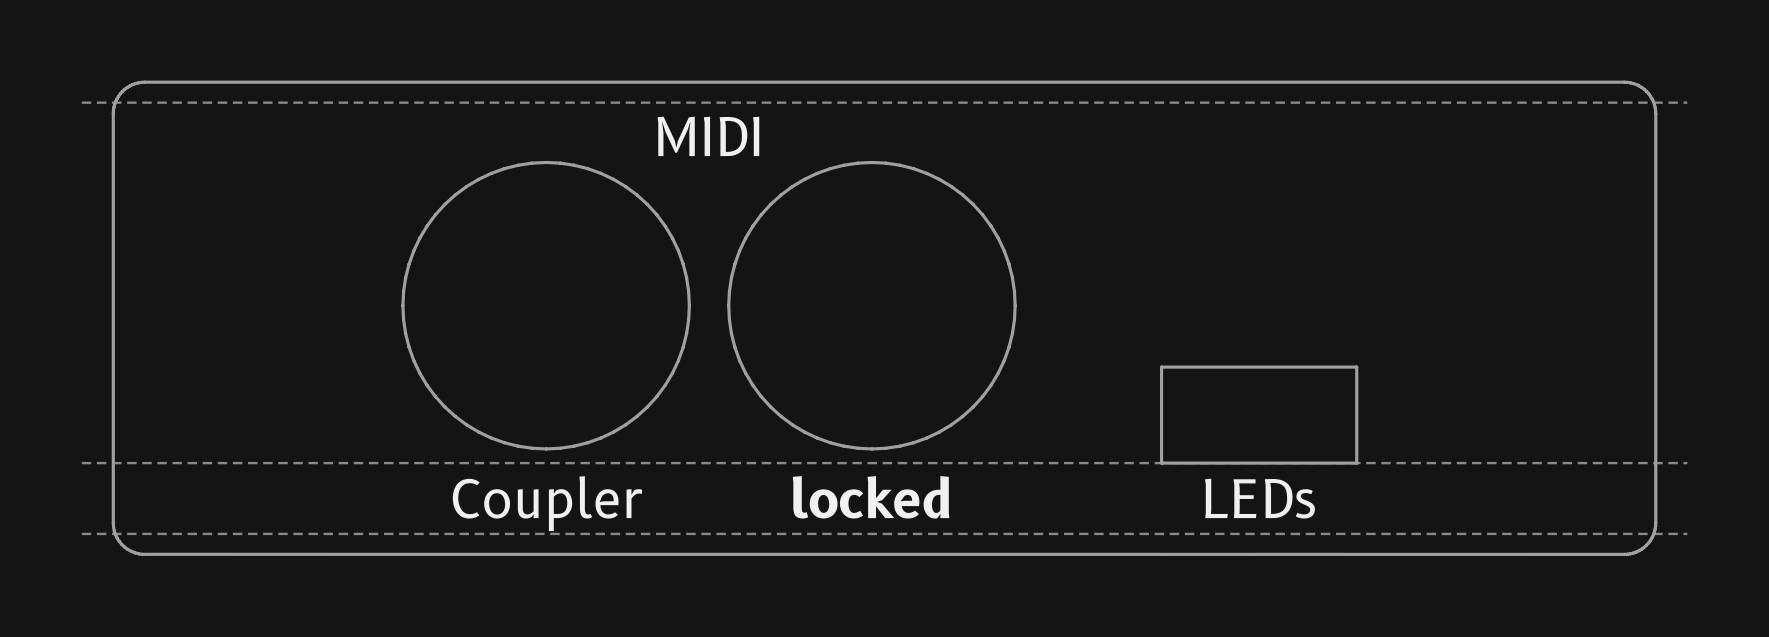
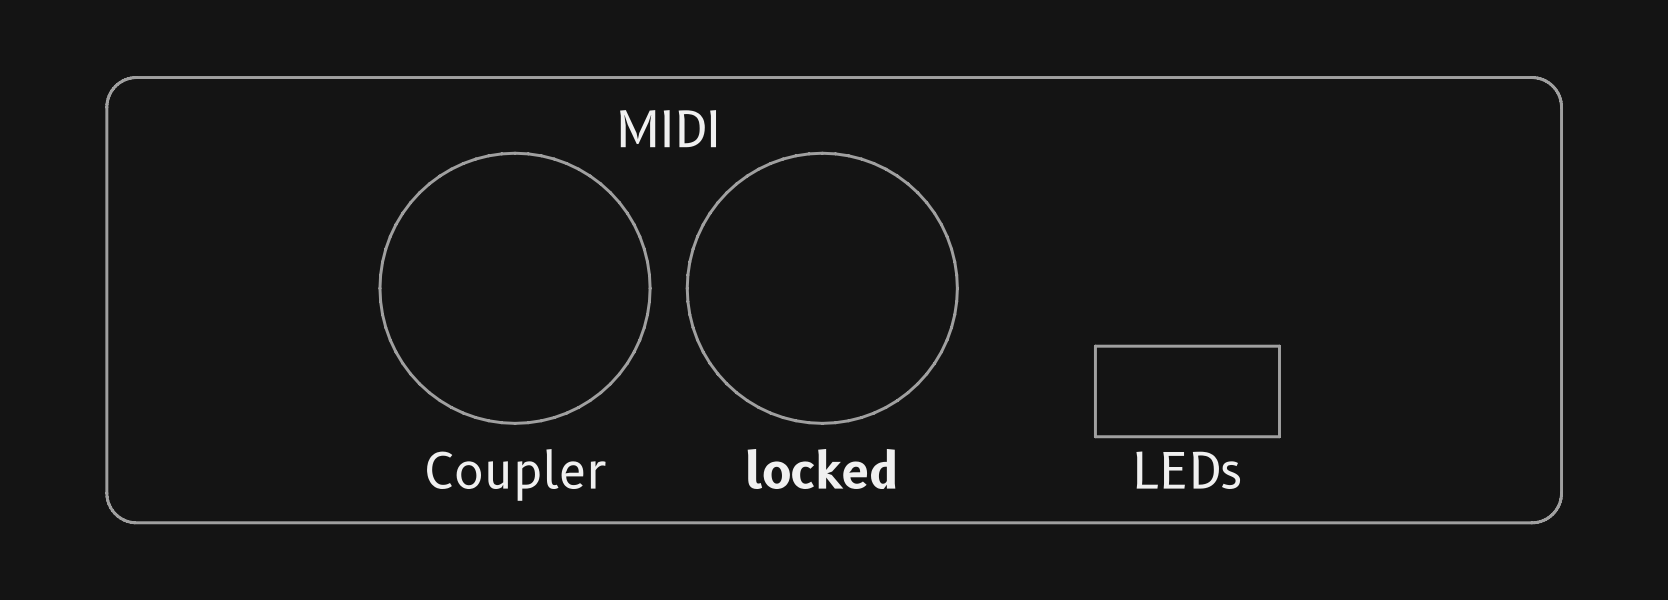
line: (81, 102) (1687, 102) -> none
line: (81, 463) (1687, 463) -> none
line: (81, 533) (1687, 533) -> none

